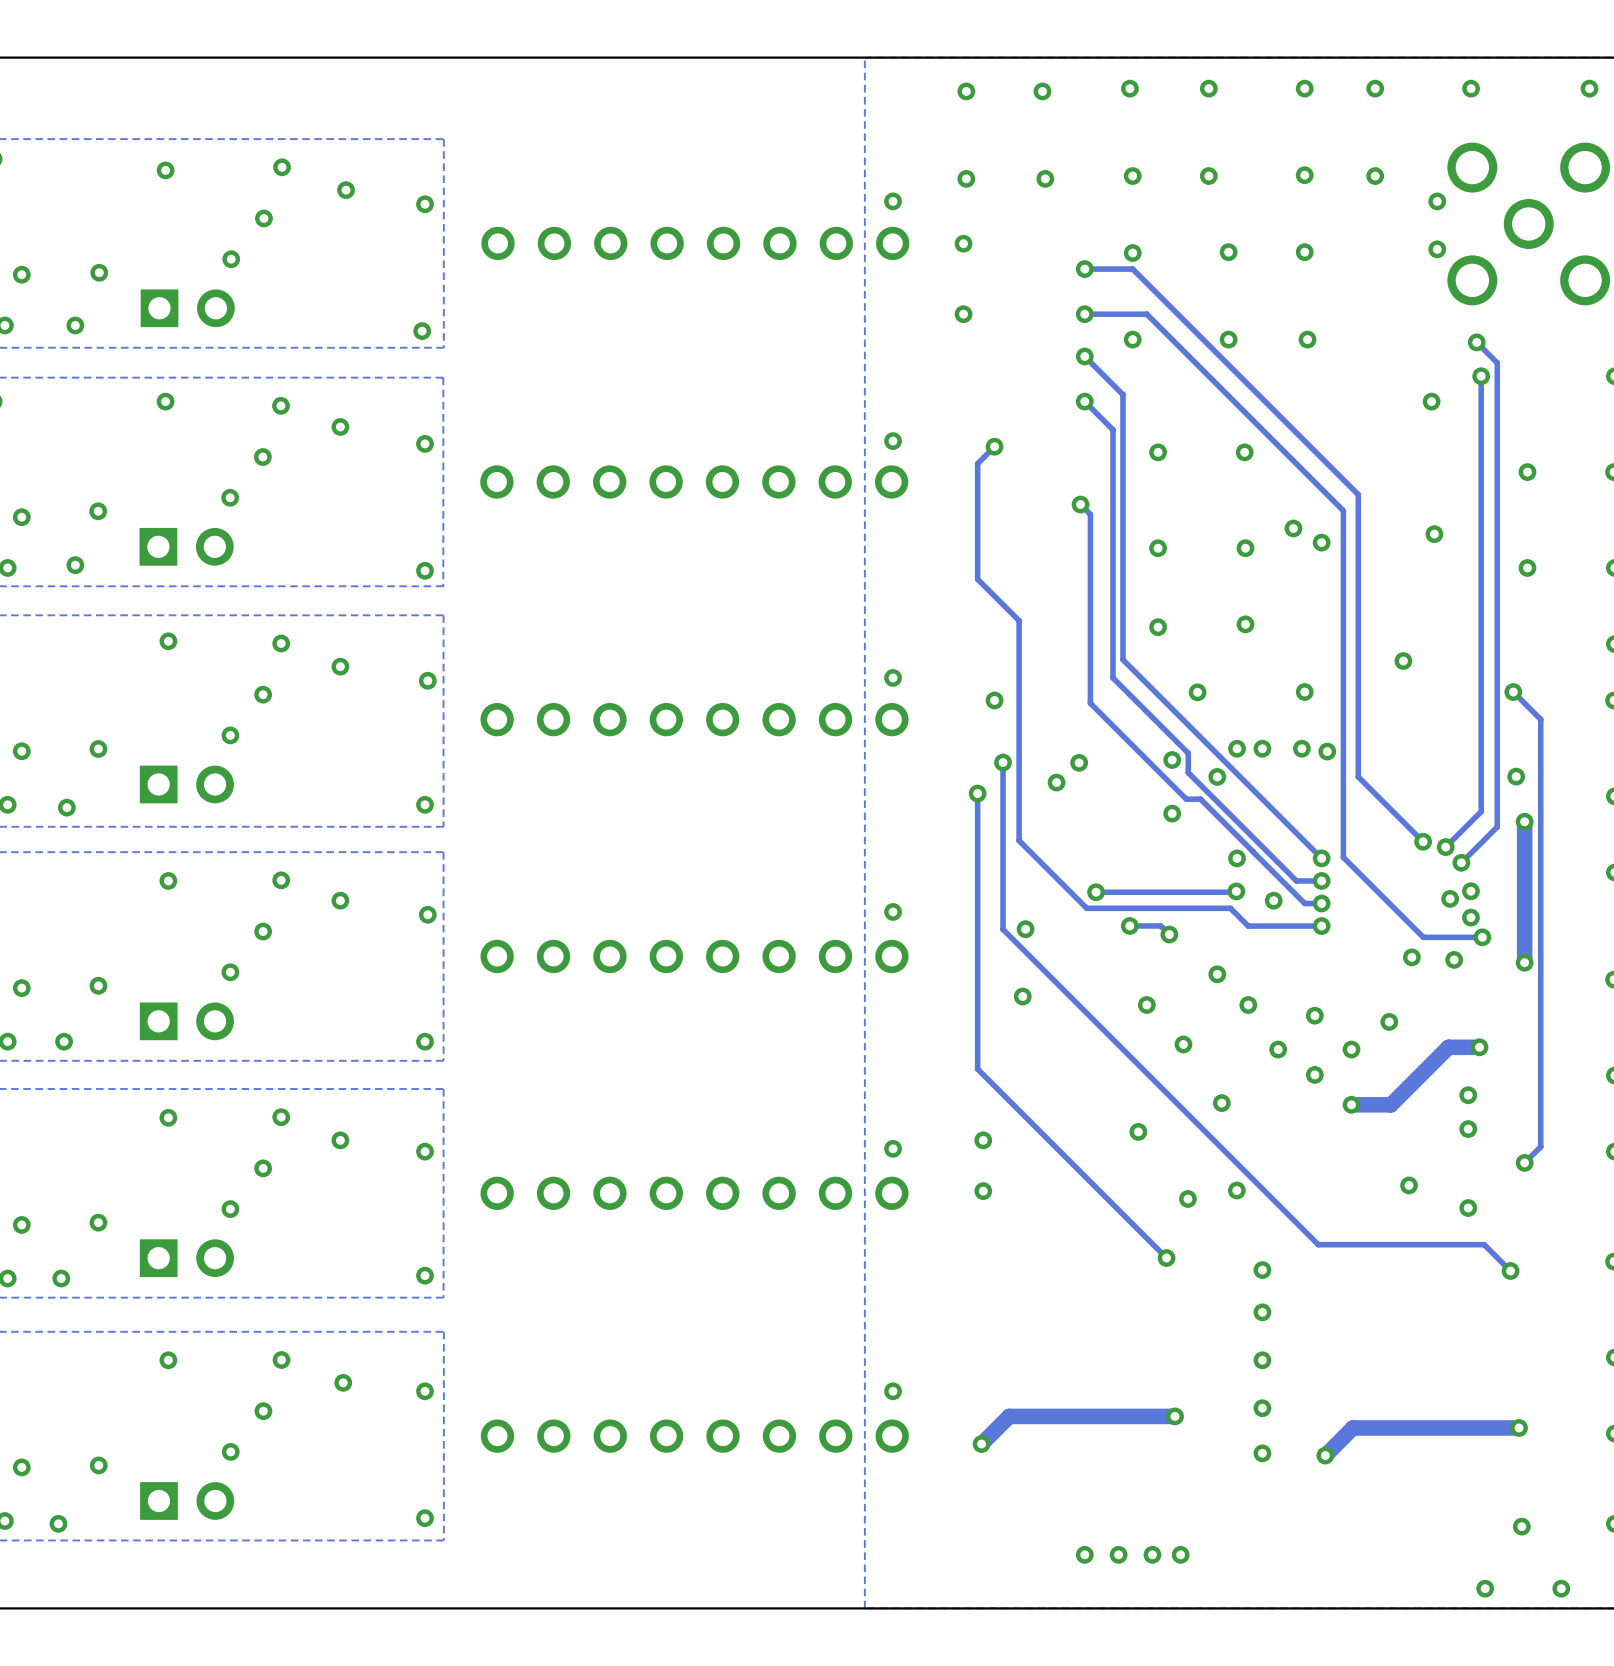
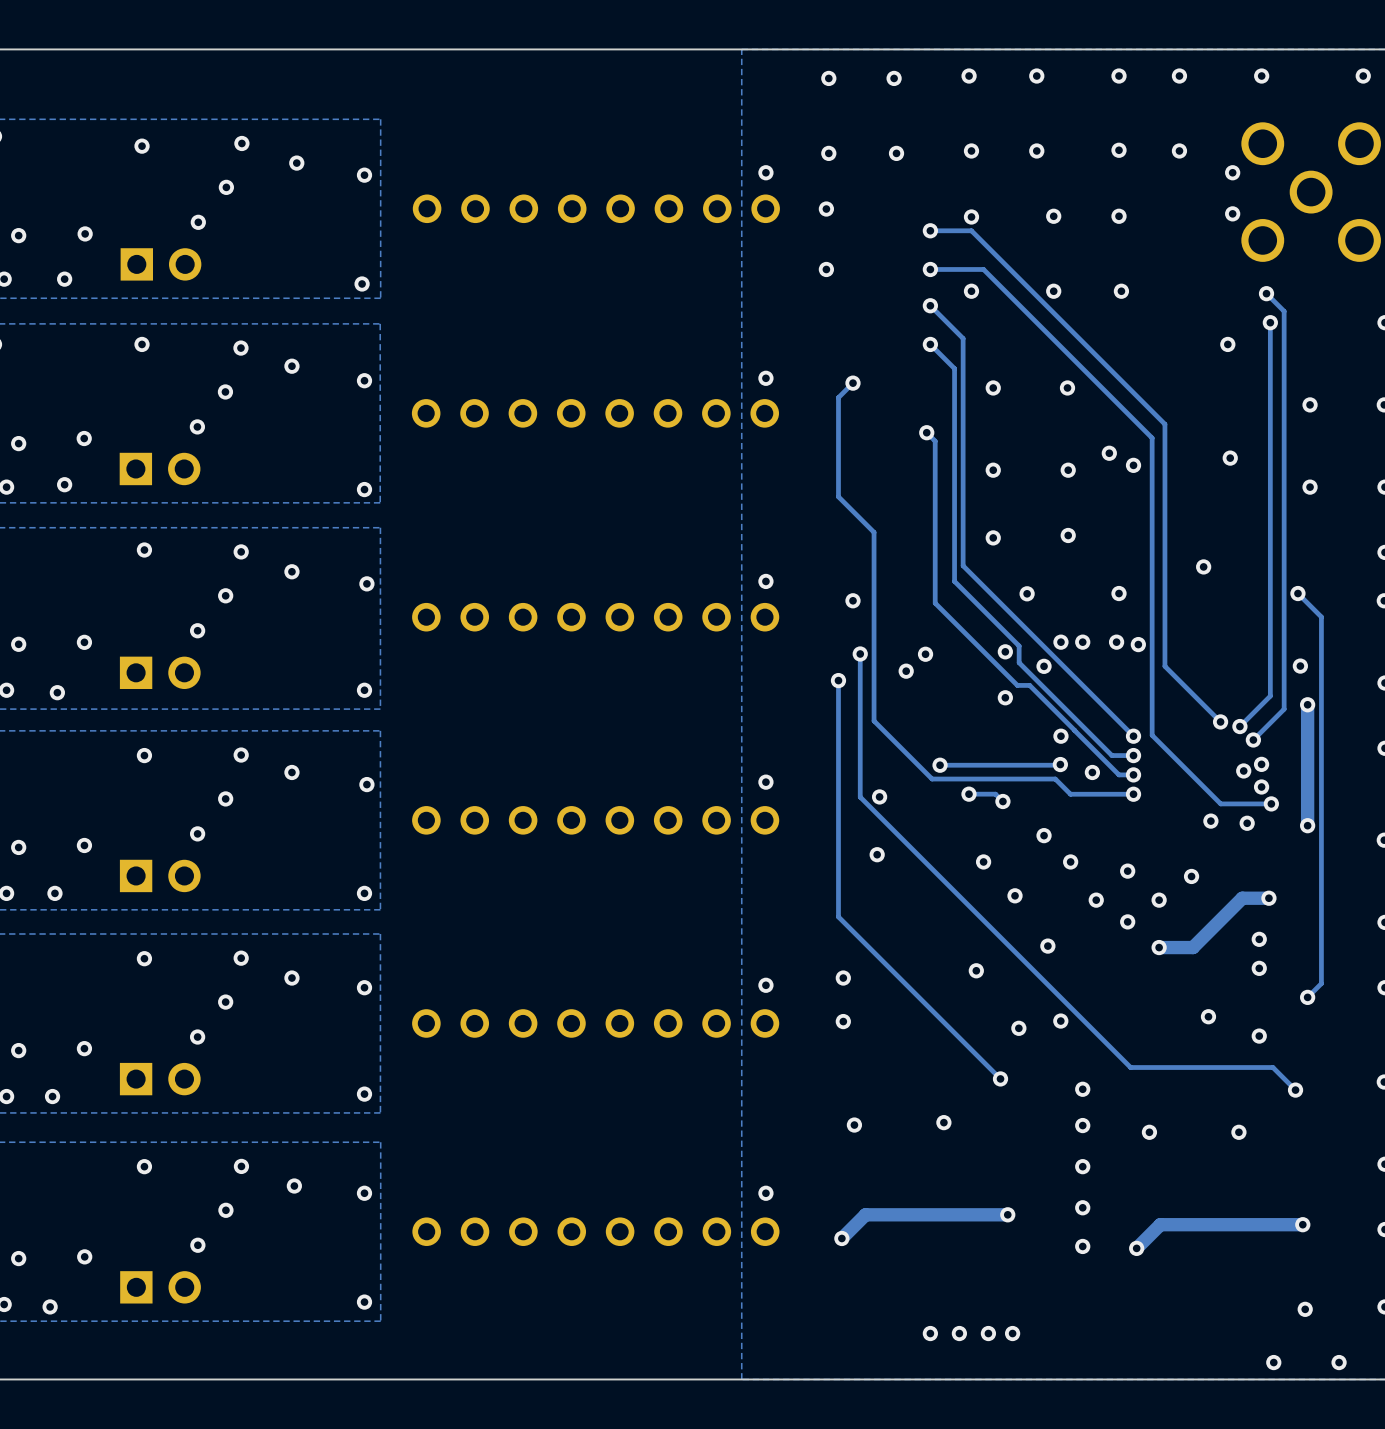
via: none -> (943, 1122)
via: none -> (854, 1125)
via: none -> (1149, 1132)
via: none -> (1238, 1132)

